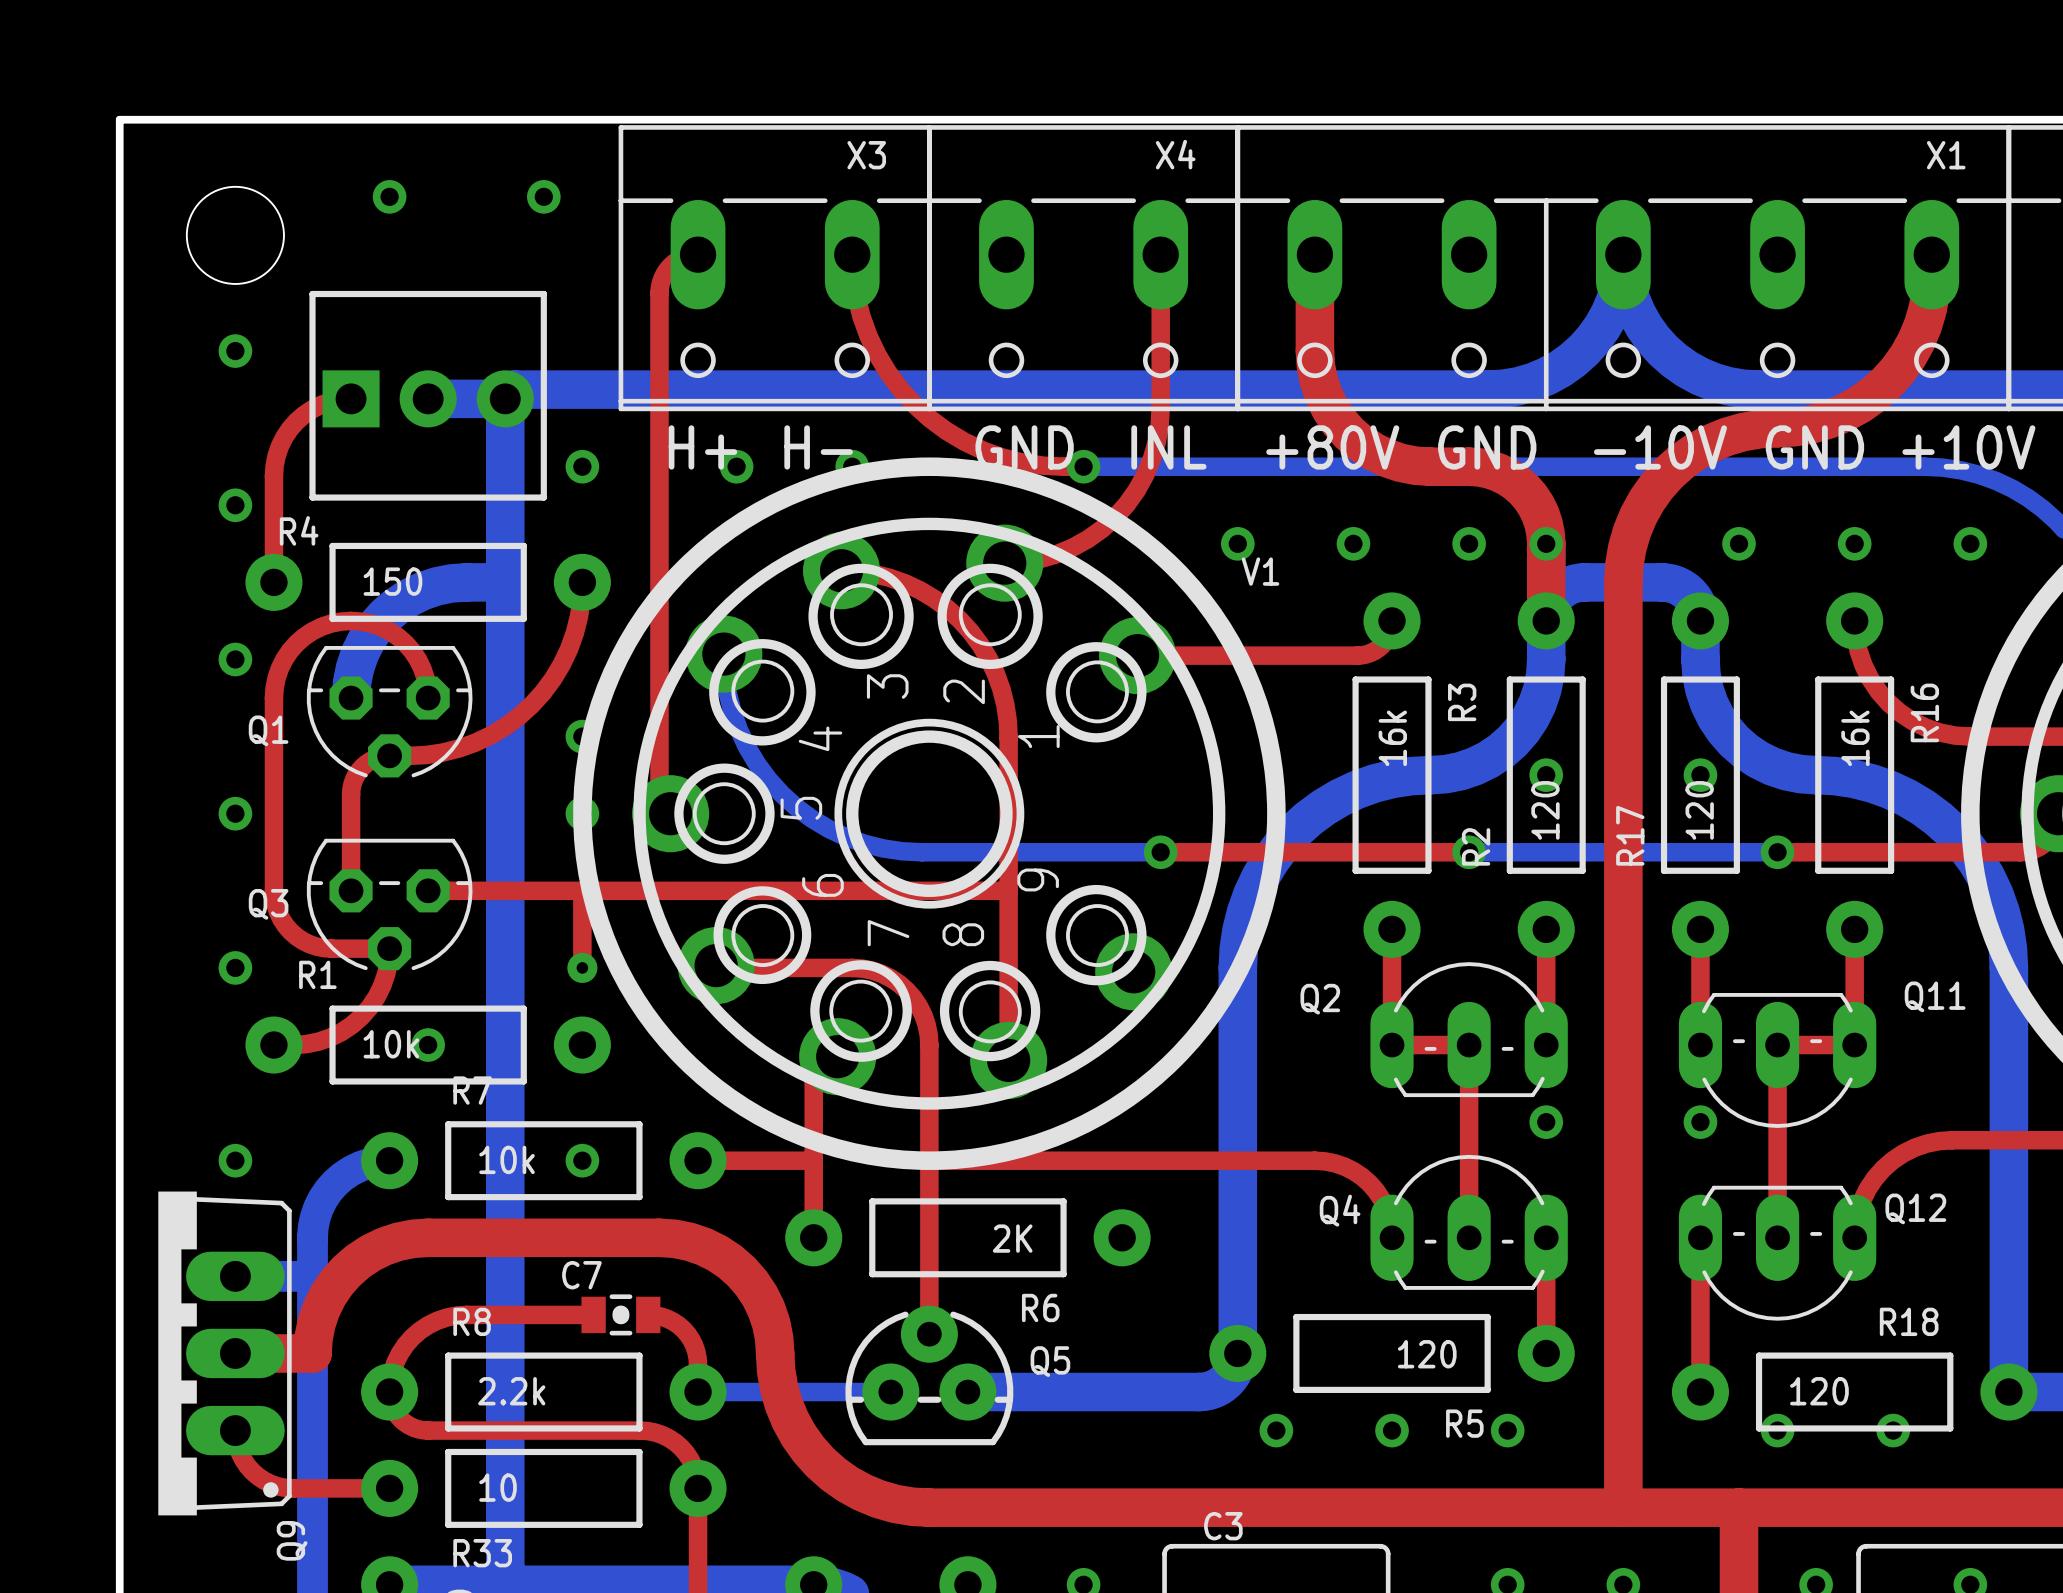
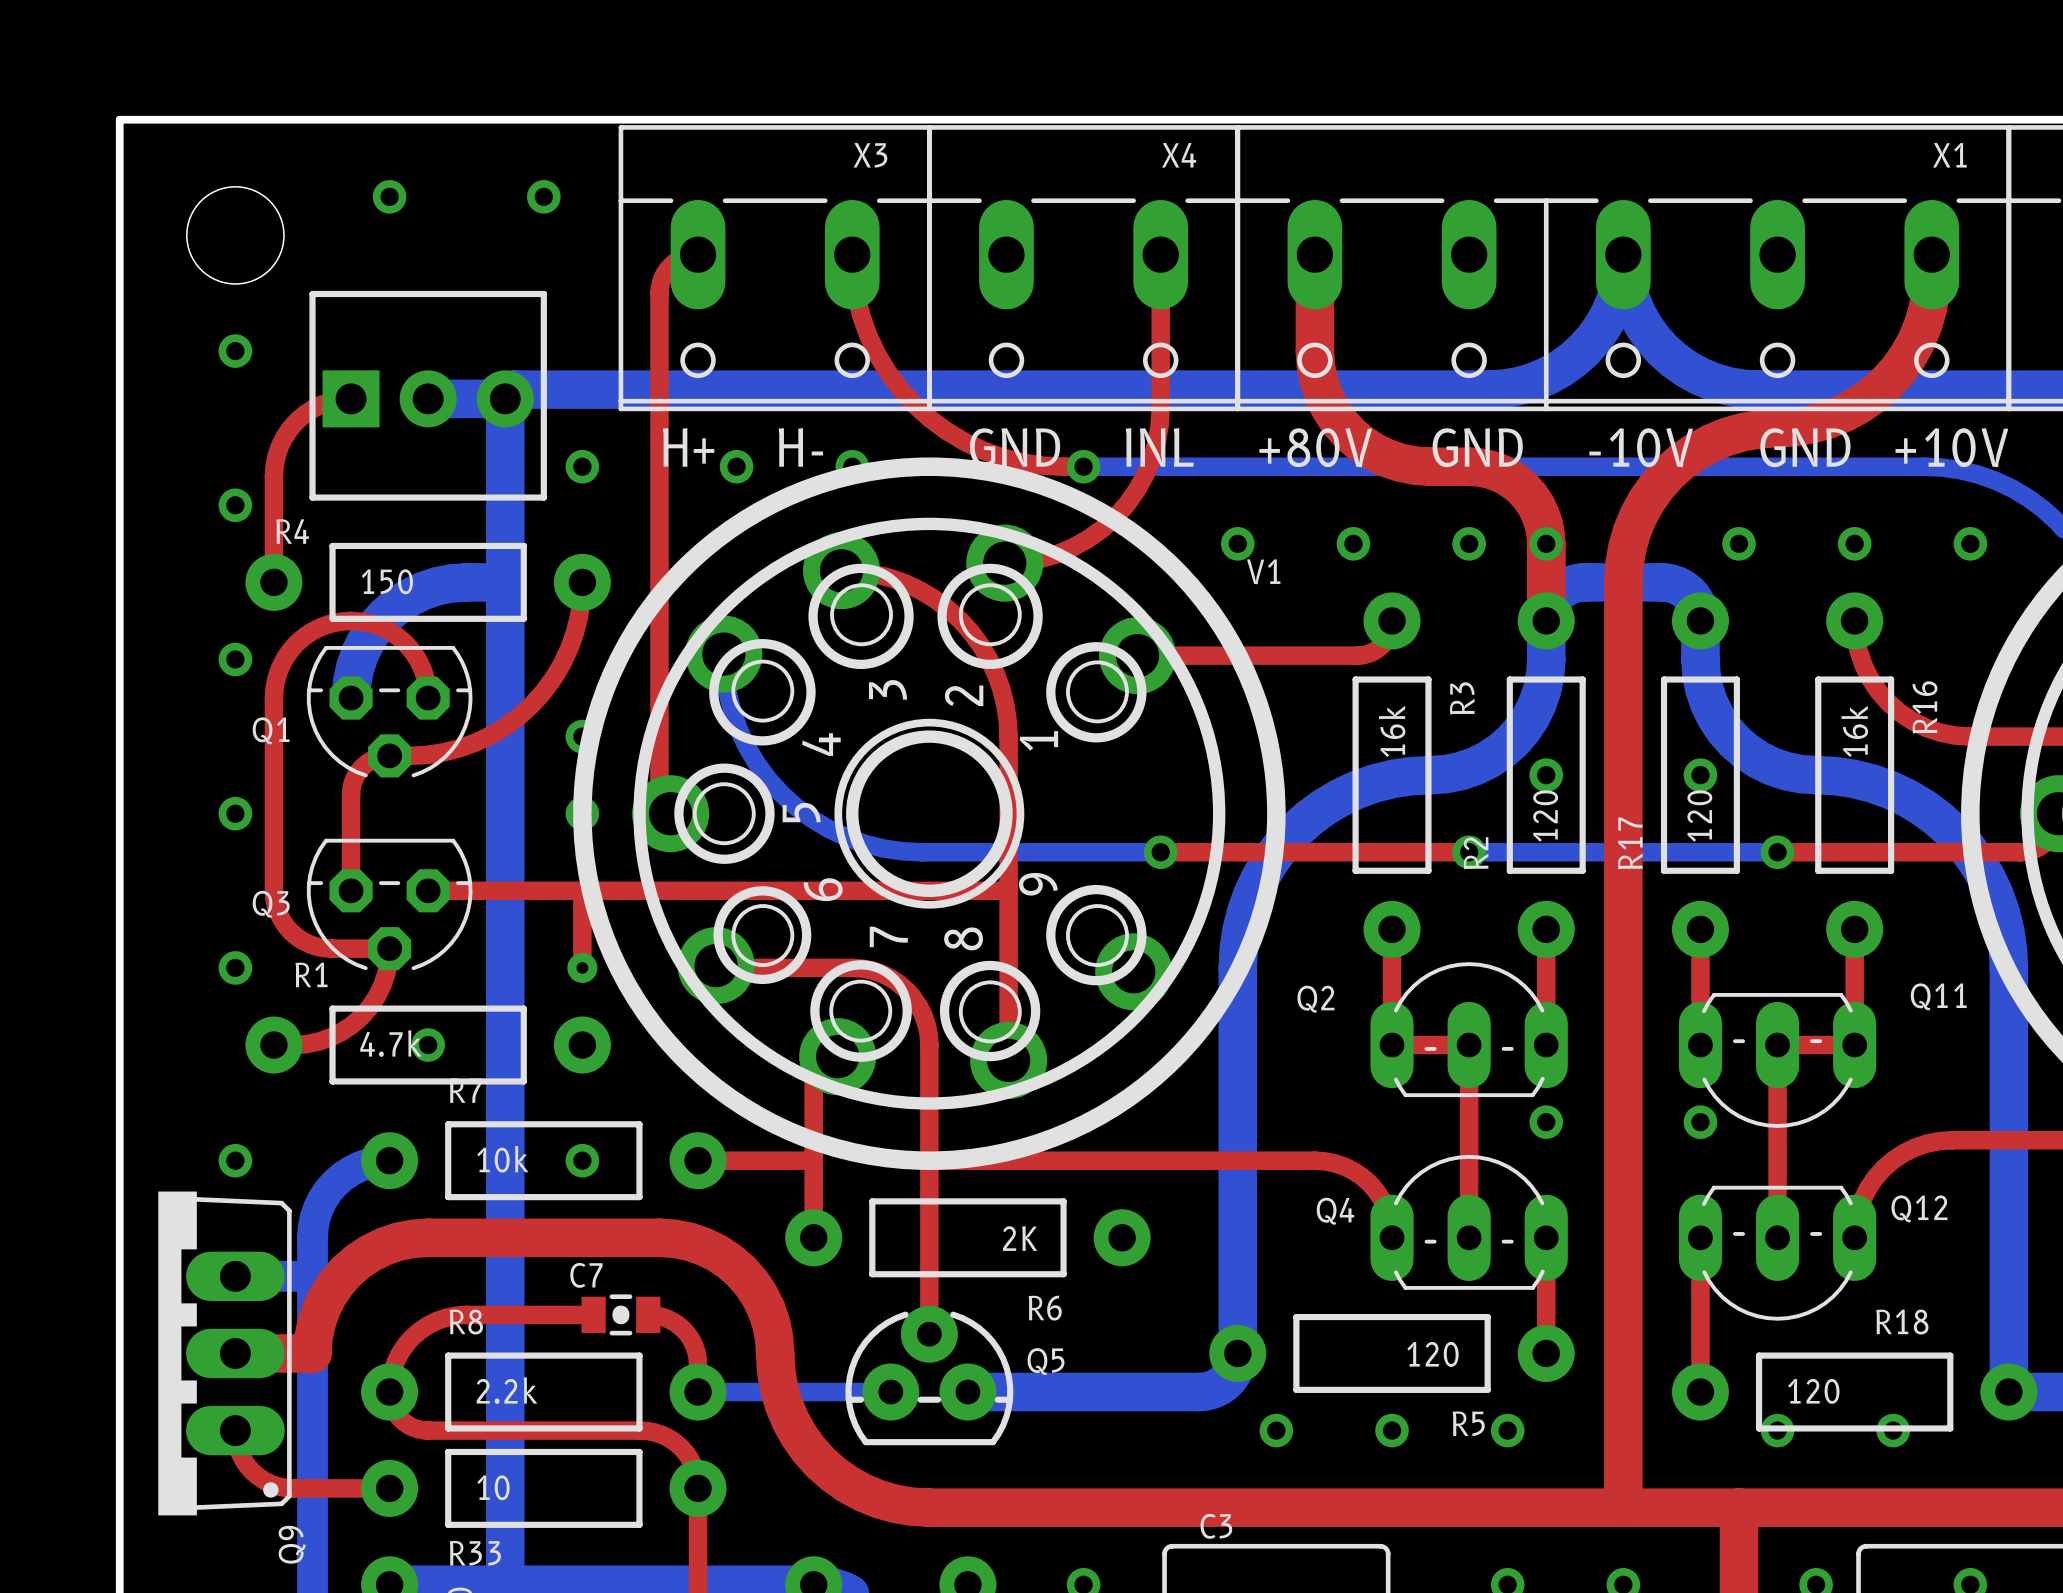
R1 value: 10k (391, 1044) -> 4.7k (390, 1043)

